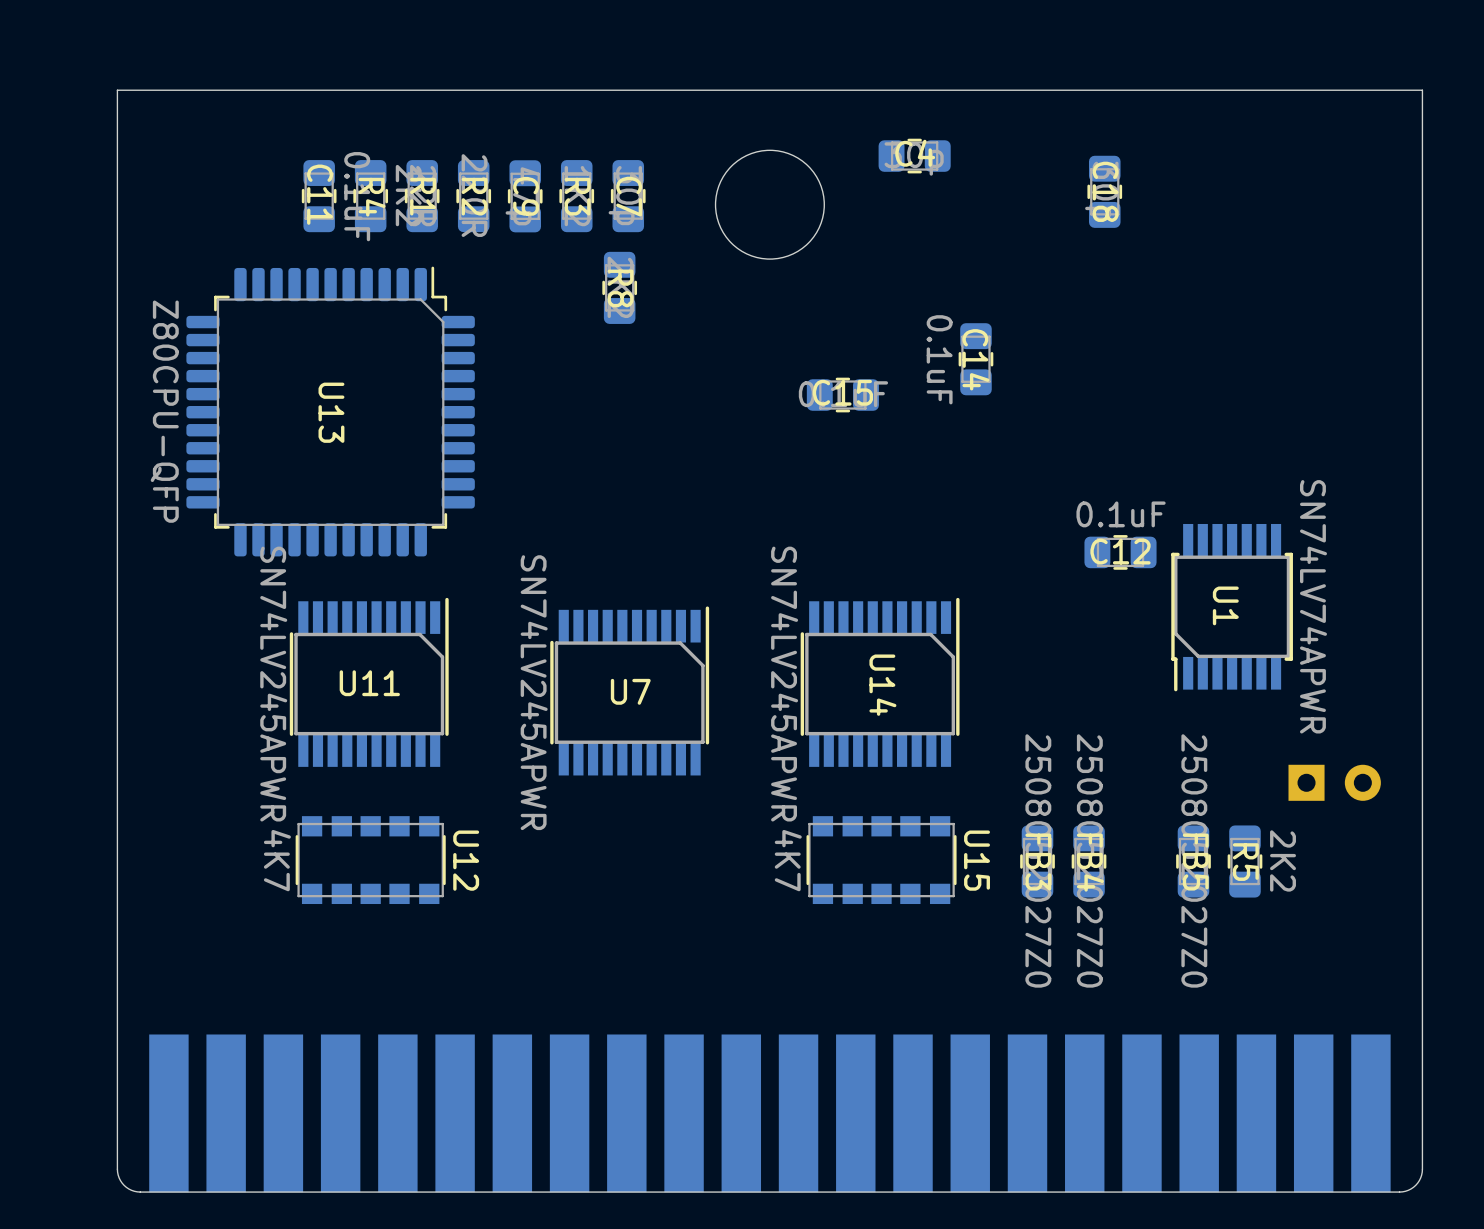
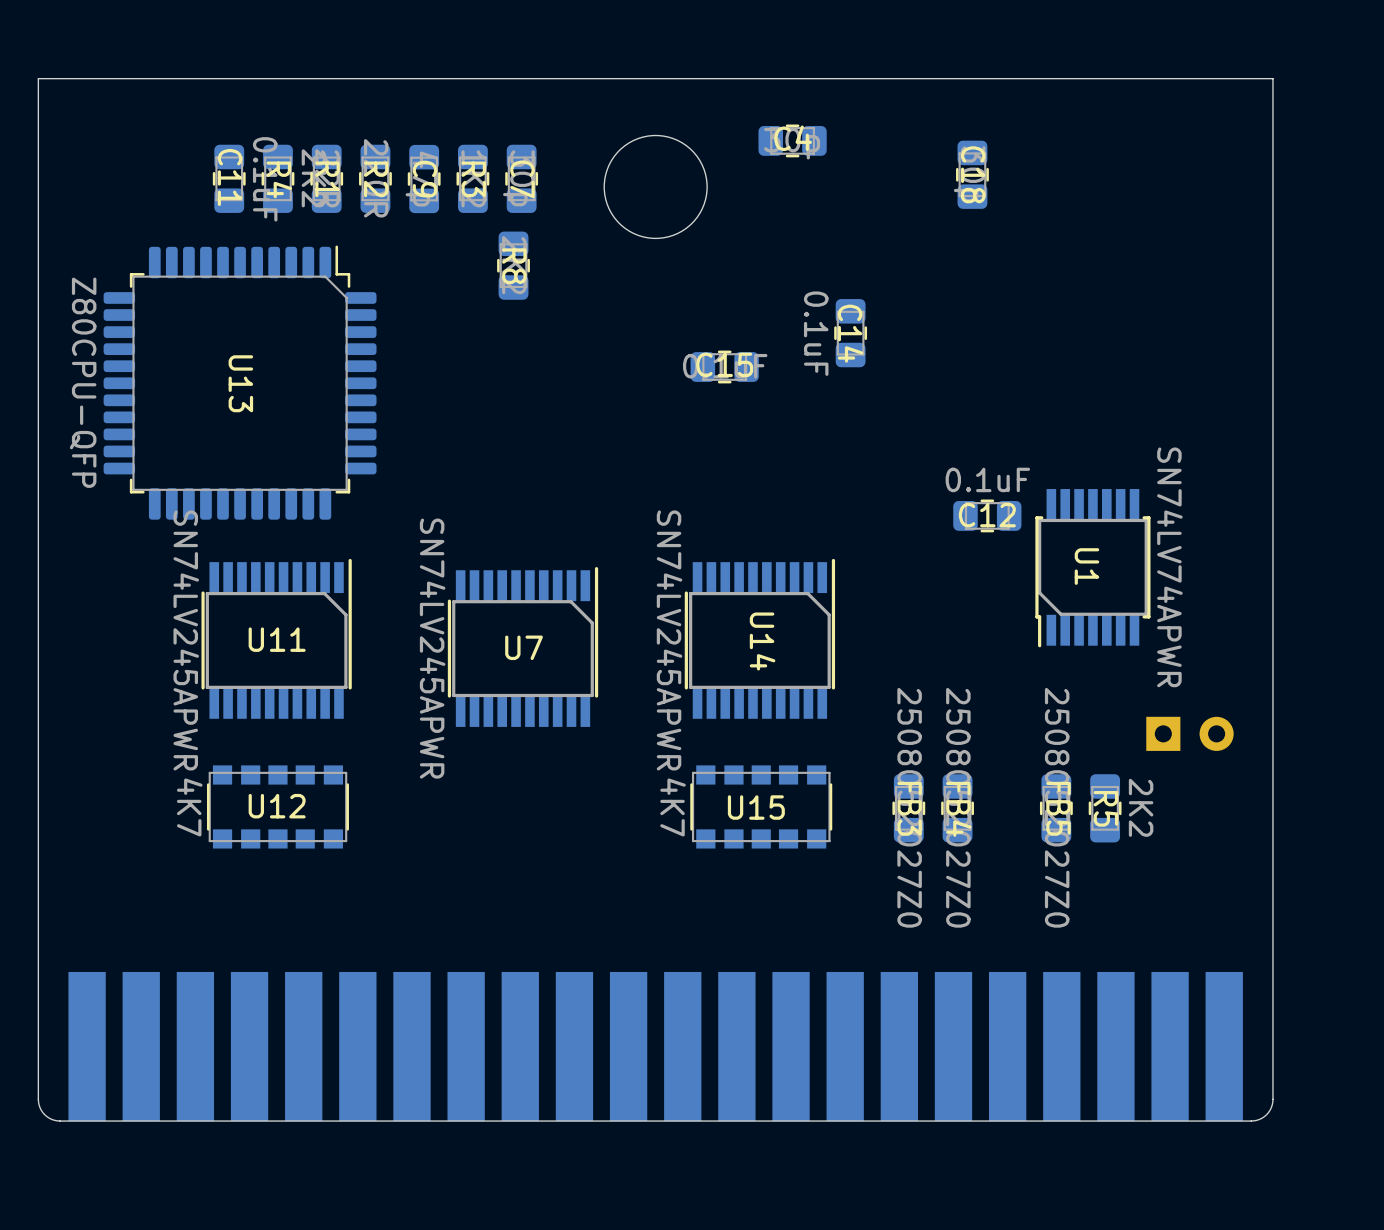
U12 name rotation: 0° (466, 860) -> 90° counterclockwise (277, 806)
U12 name position: U12 (466, 860) -> U12 (277, 806)
U15 name rotation: 0° (977, 860) -> 90° counterclockwise (756, 807)
U15 name position: U15 (977, 860) -> U15 (756, 807)

